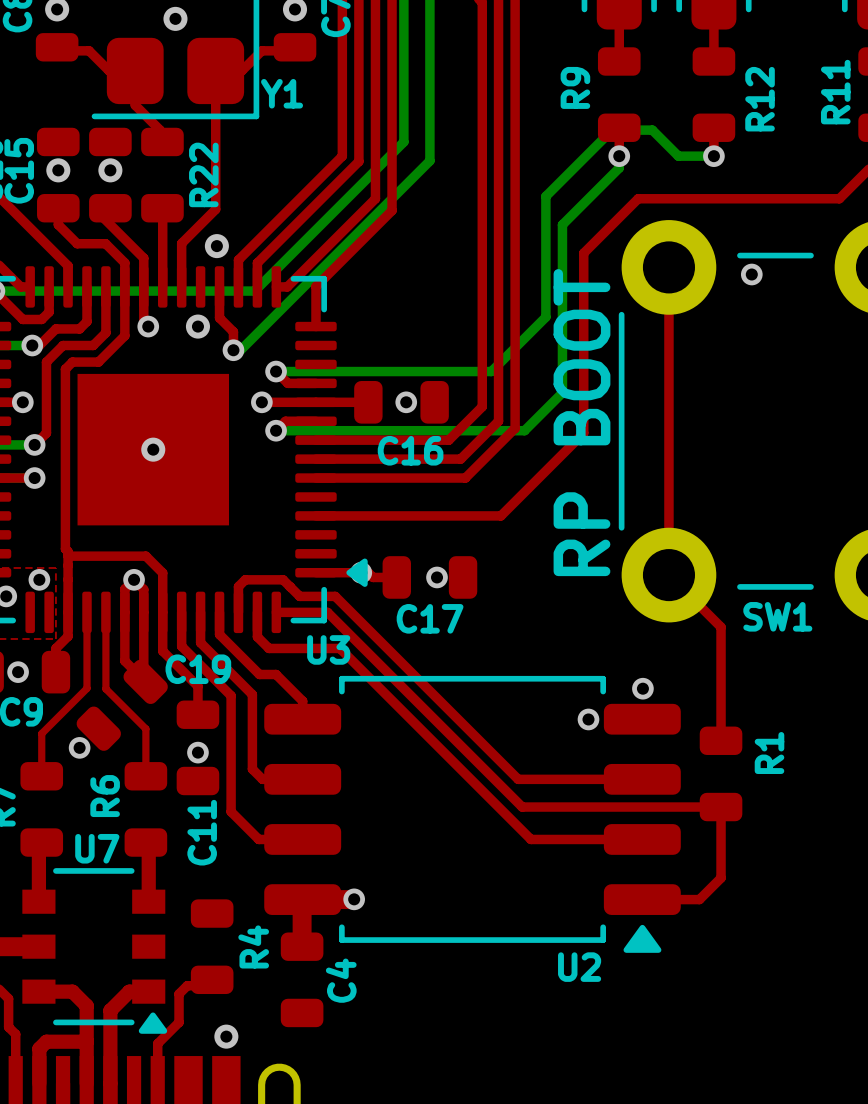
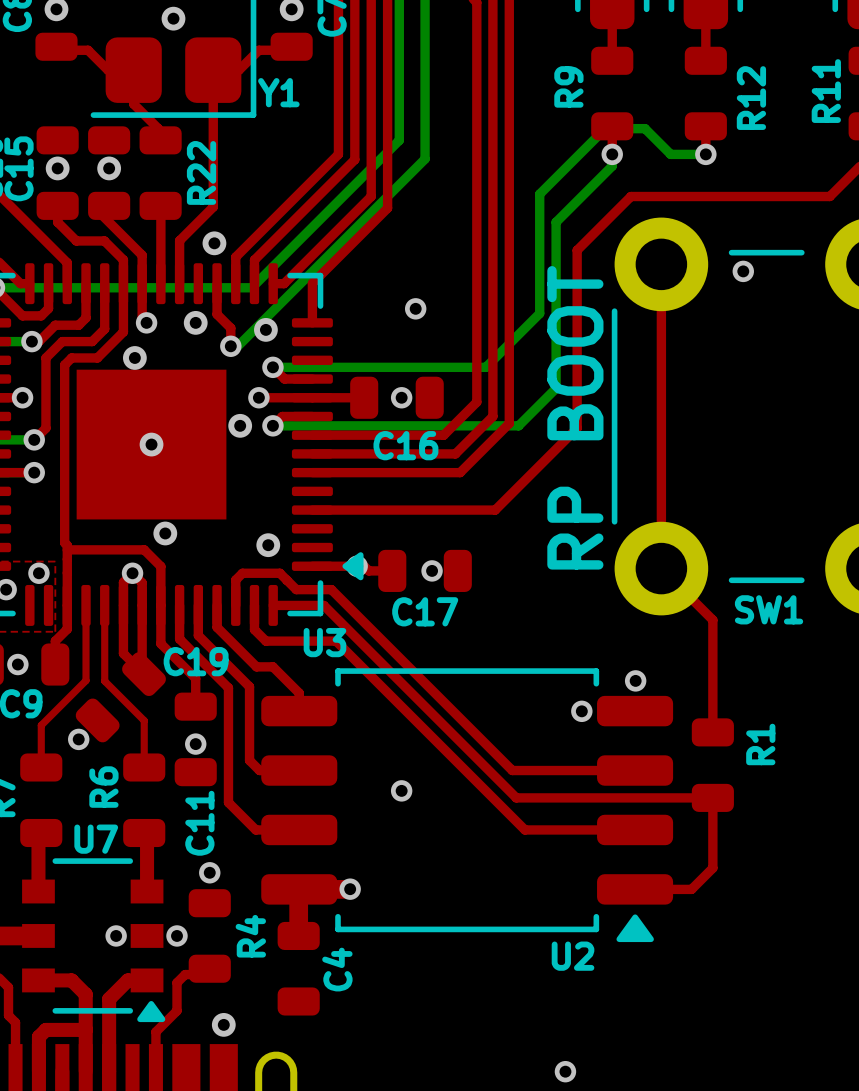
via: none -> (415, 308)
via: none -> (265, 329)
via: none -> (134, 357)
via: none -> (240, 425)
via: none -> (165, 533)
via: none -> (268, 545)
via: none -> (401, 790)
via: none -> (209, 872)
via: none -> (116, 935)
via: none -> (177, 935)
via: none -> (565, 1071)

